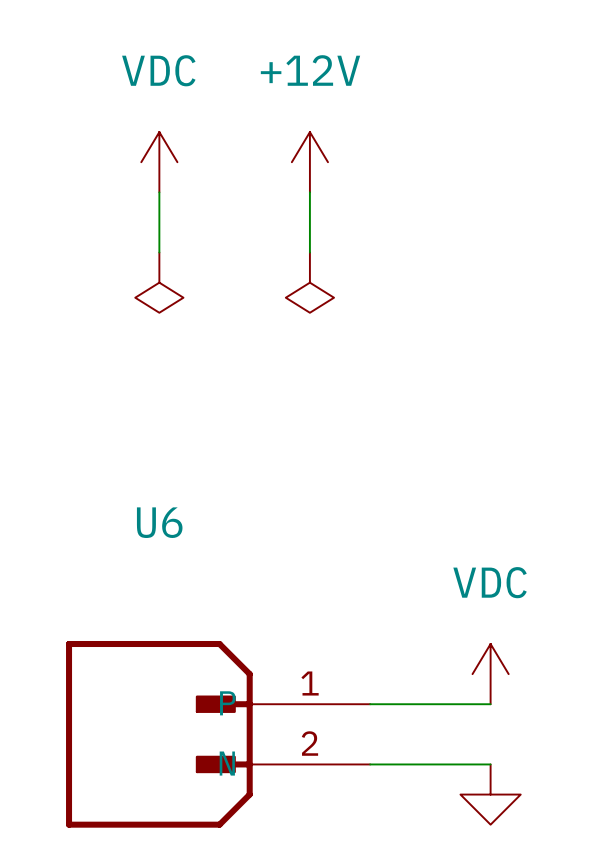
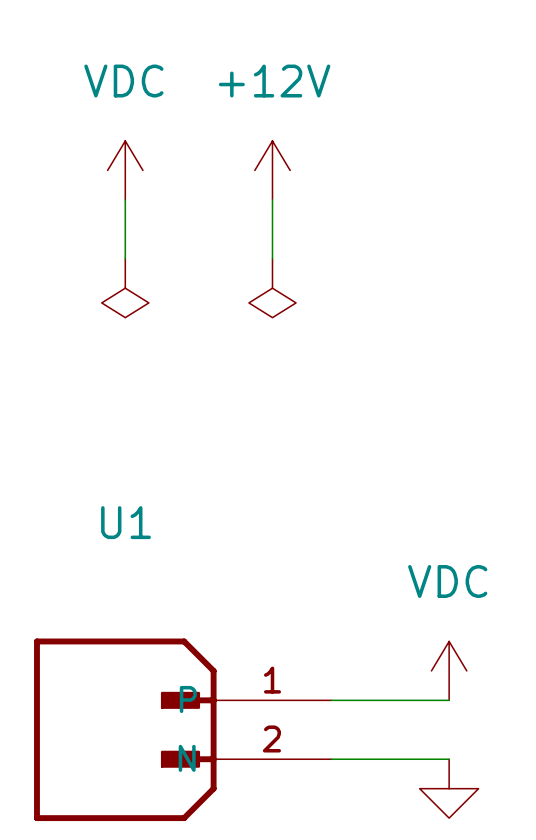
U6 name: U6 (159, 522) -> U1 (125, 522)

